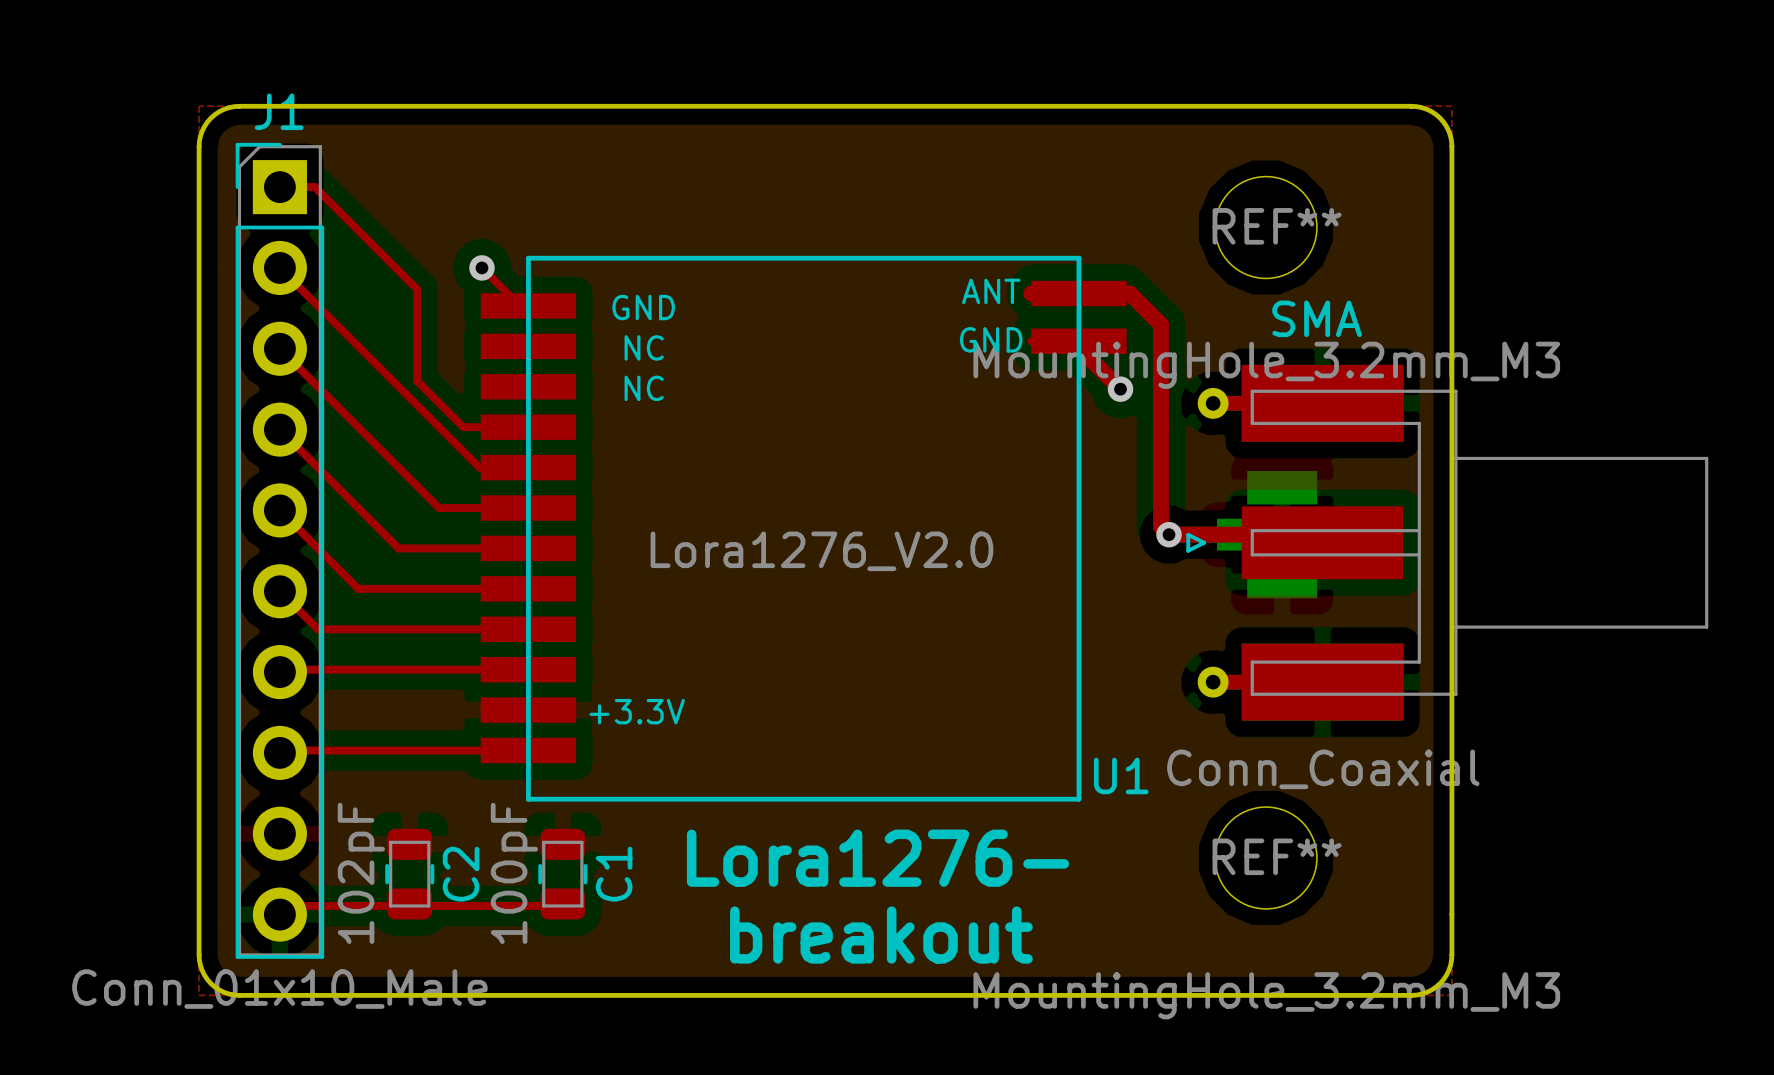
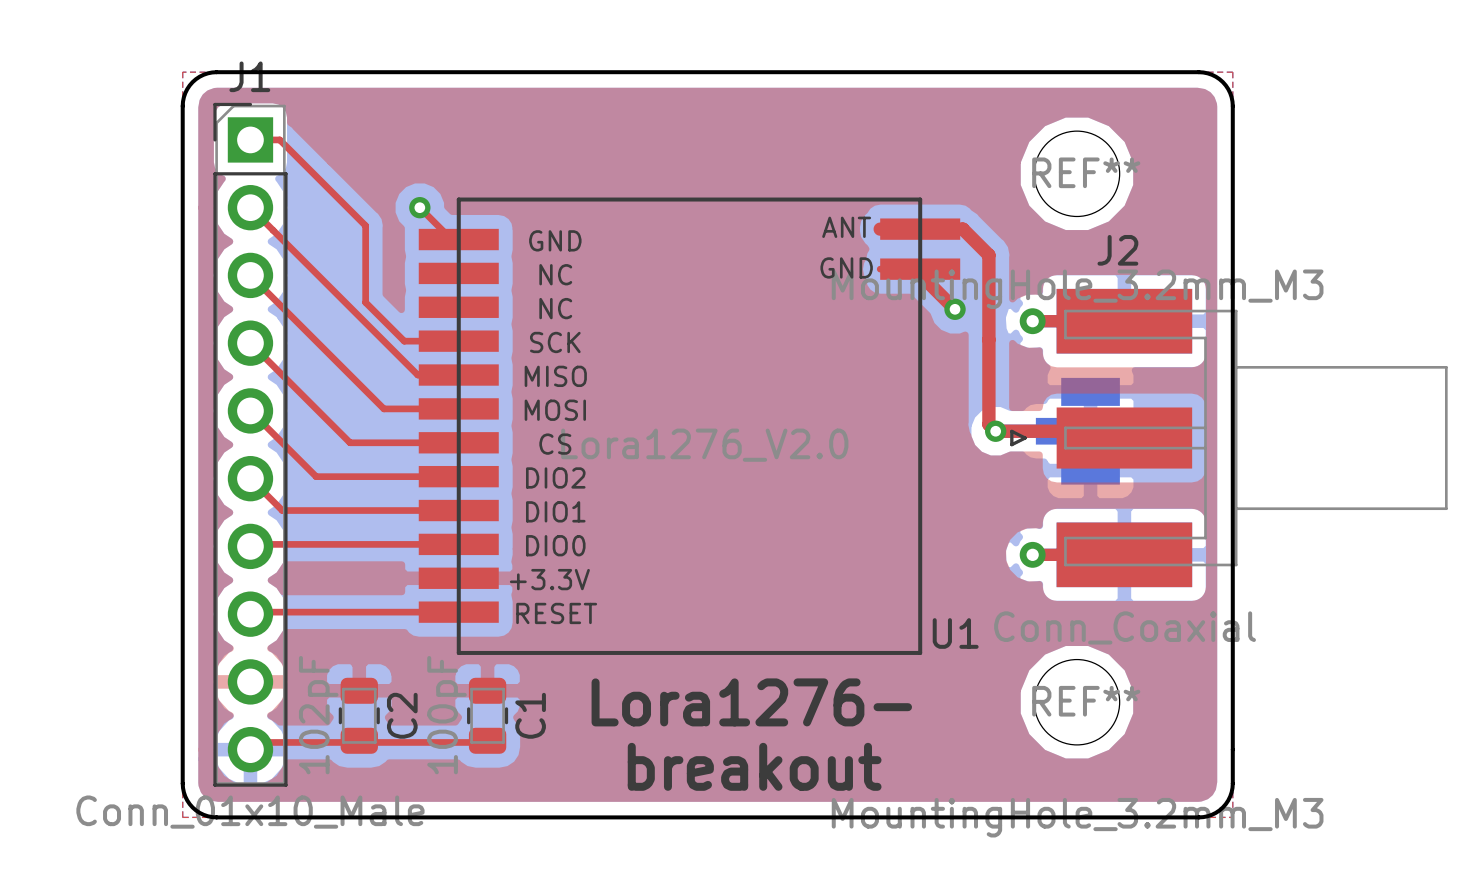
SMA name: SMA (1317, 318) -> J2 (1117, 250)
text: none -> SCK (555, 342)
text: none -> MISO (555, 376)
text: none -> MOSI (555, 410)
text: none -> CS (555, 444)
text: none -> DIO2 (555, 477)
text: none -> DIO1 (555, 511)
text: none -> DIO0 (555, 545)
text: none -> RESET (556, 613)

